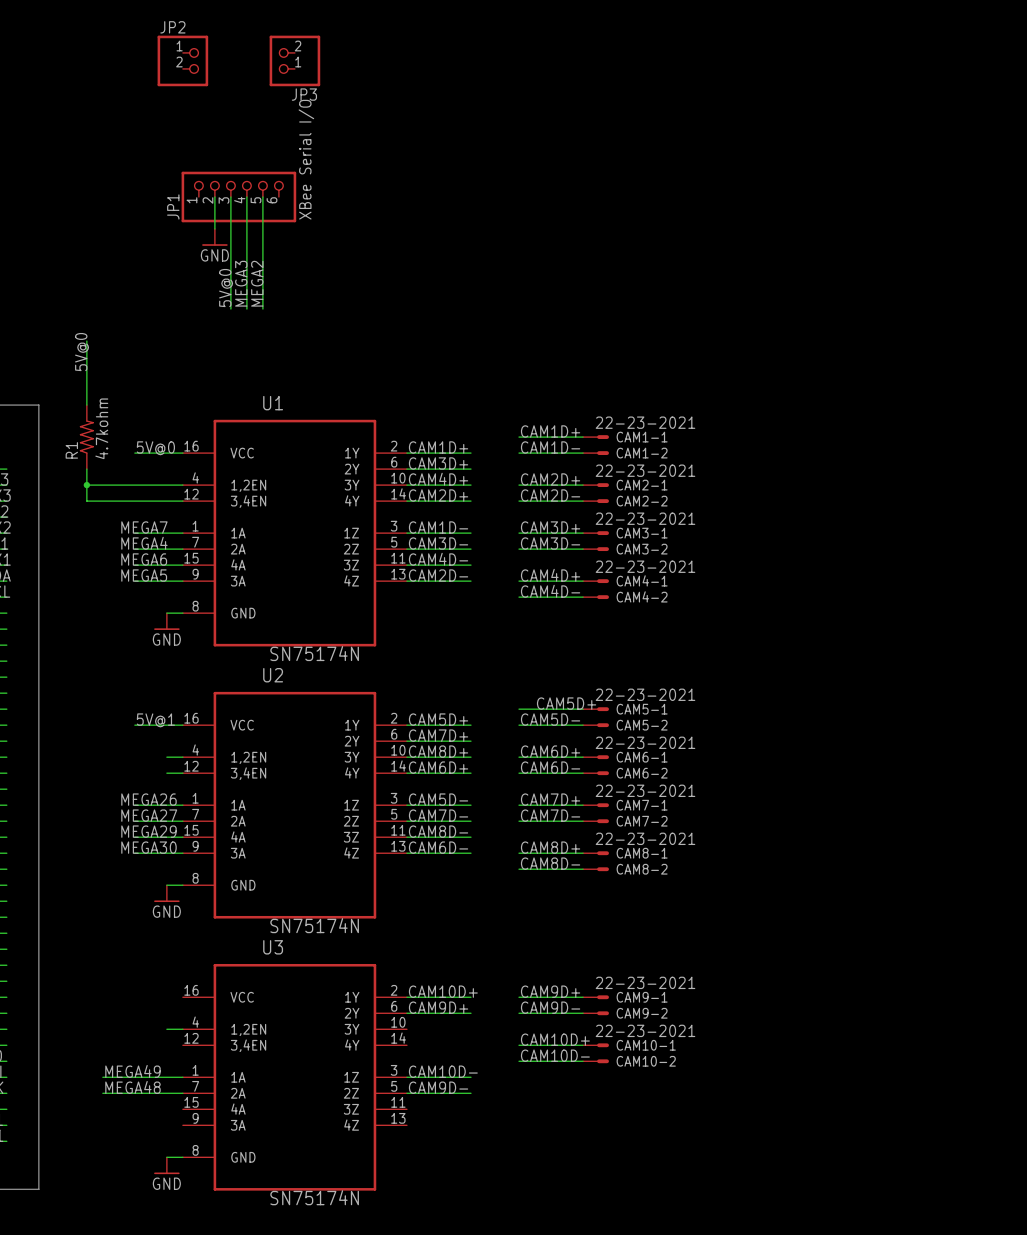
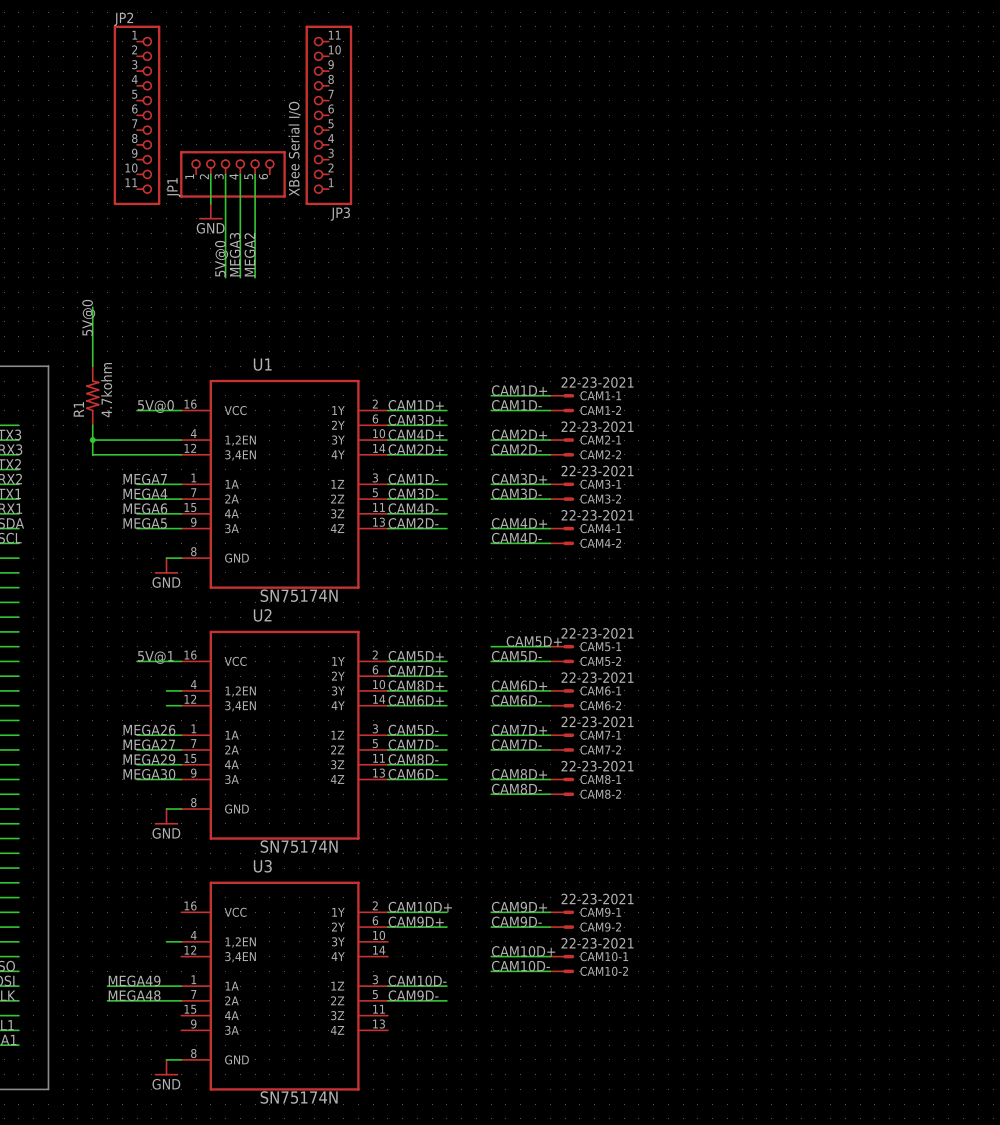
JP2 name position: JP2 (172, 27) -> JP2 (123, 19)
JP2 symbol: [157, 35, 209, 87] -> [113, 25, 161, 206]
JP3 symbol: [269, 35, 321, 87] -> [305, 25, 353, 206]
JP3 name position: JP3 (304, 94) -> JP3 (340, 214)

